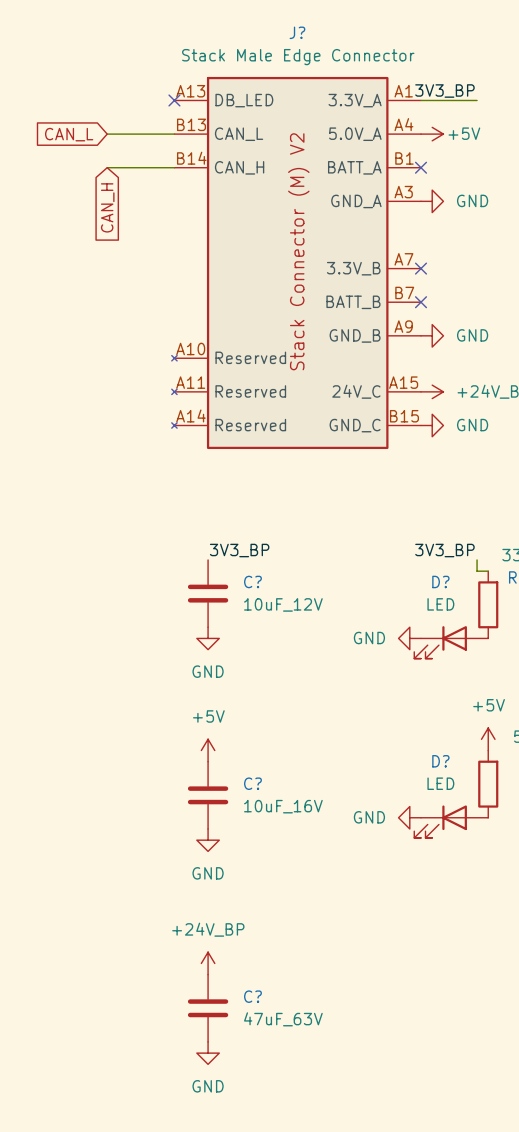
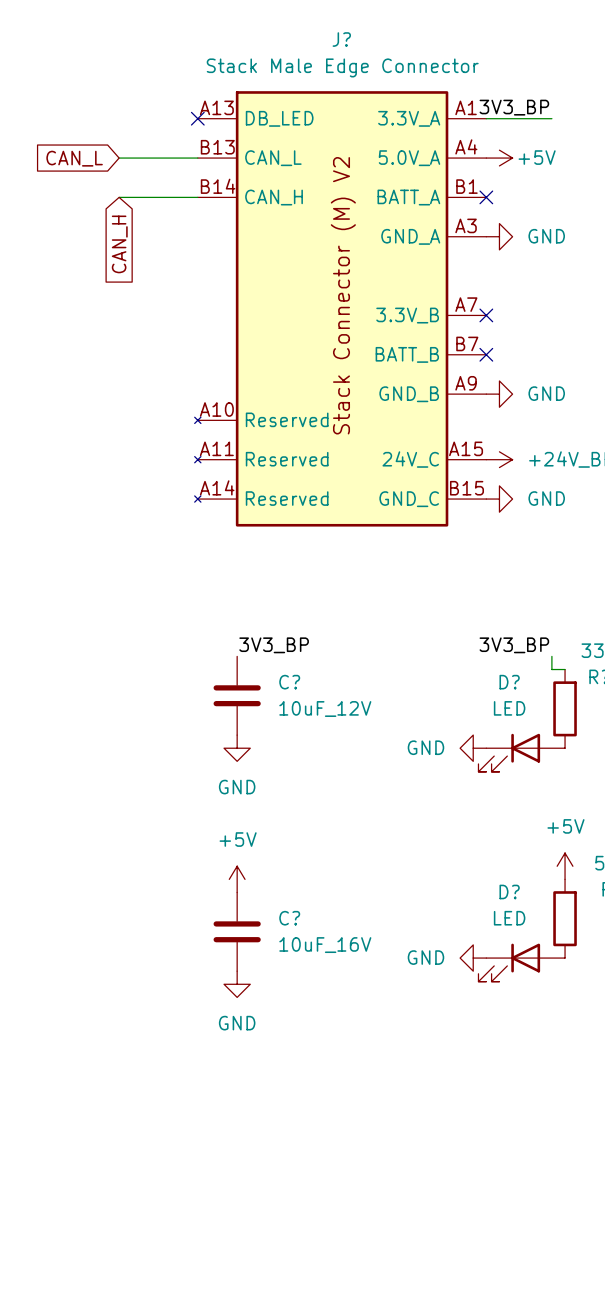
power symbol: +24V_BP (208, 963) -> none
C?: 47uF_63V (208, 1008) -> none
power symbol: GND (208, 1053) -> none

